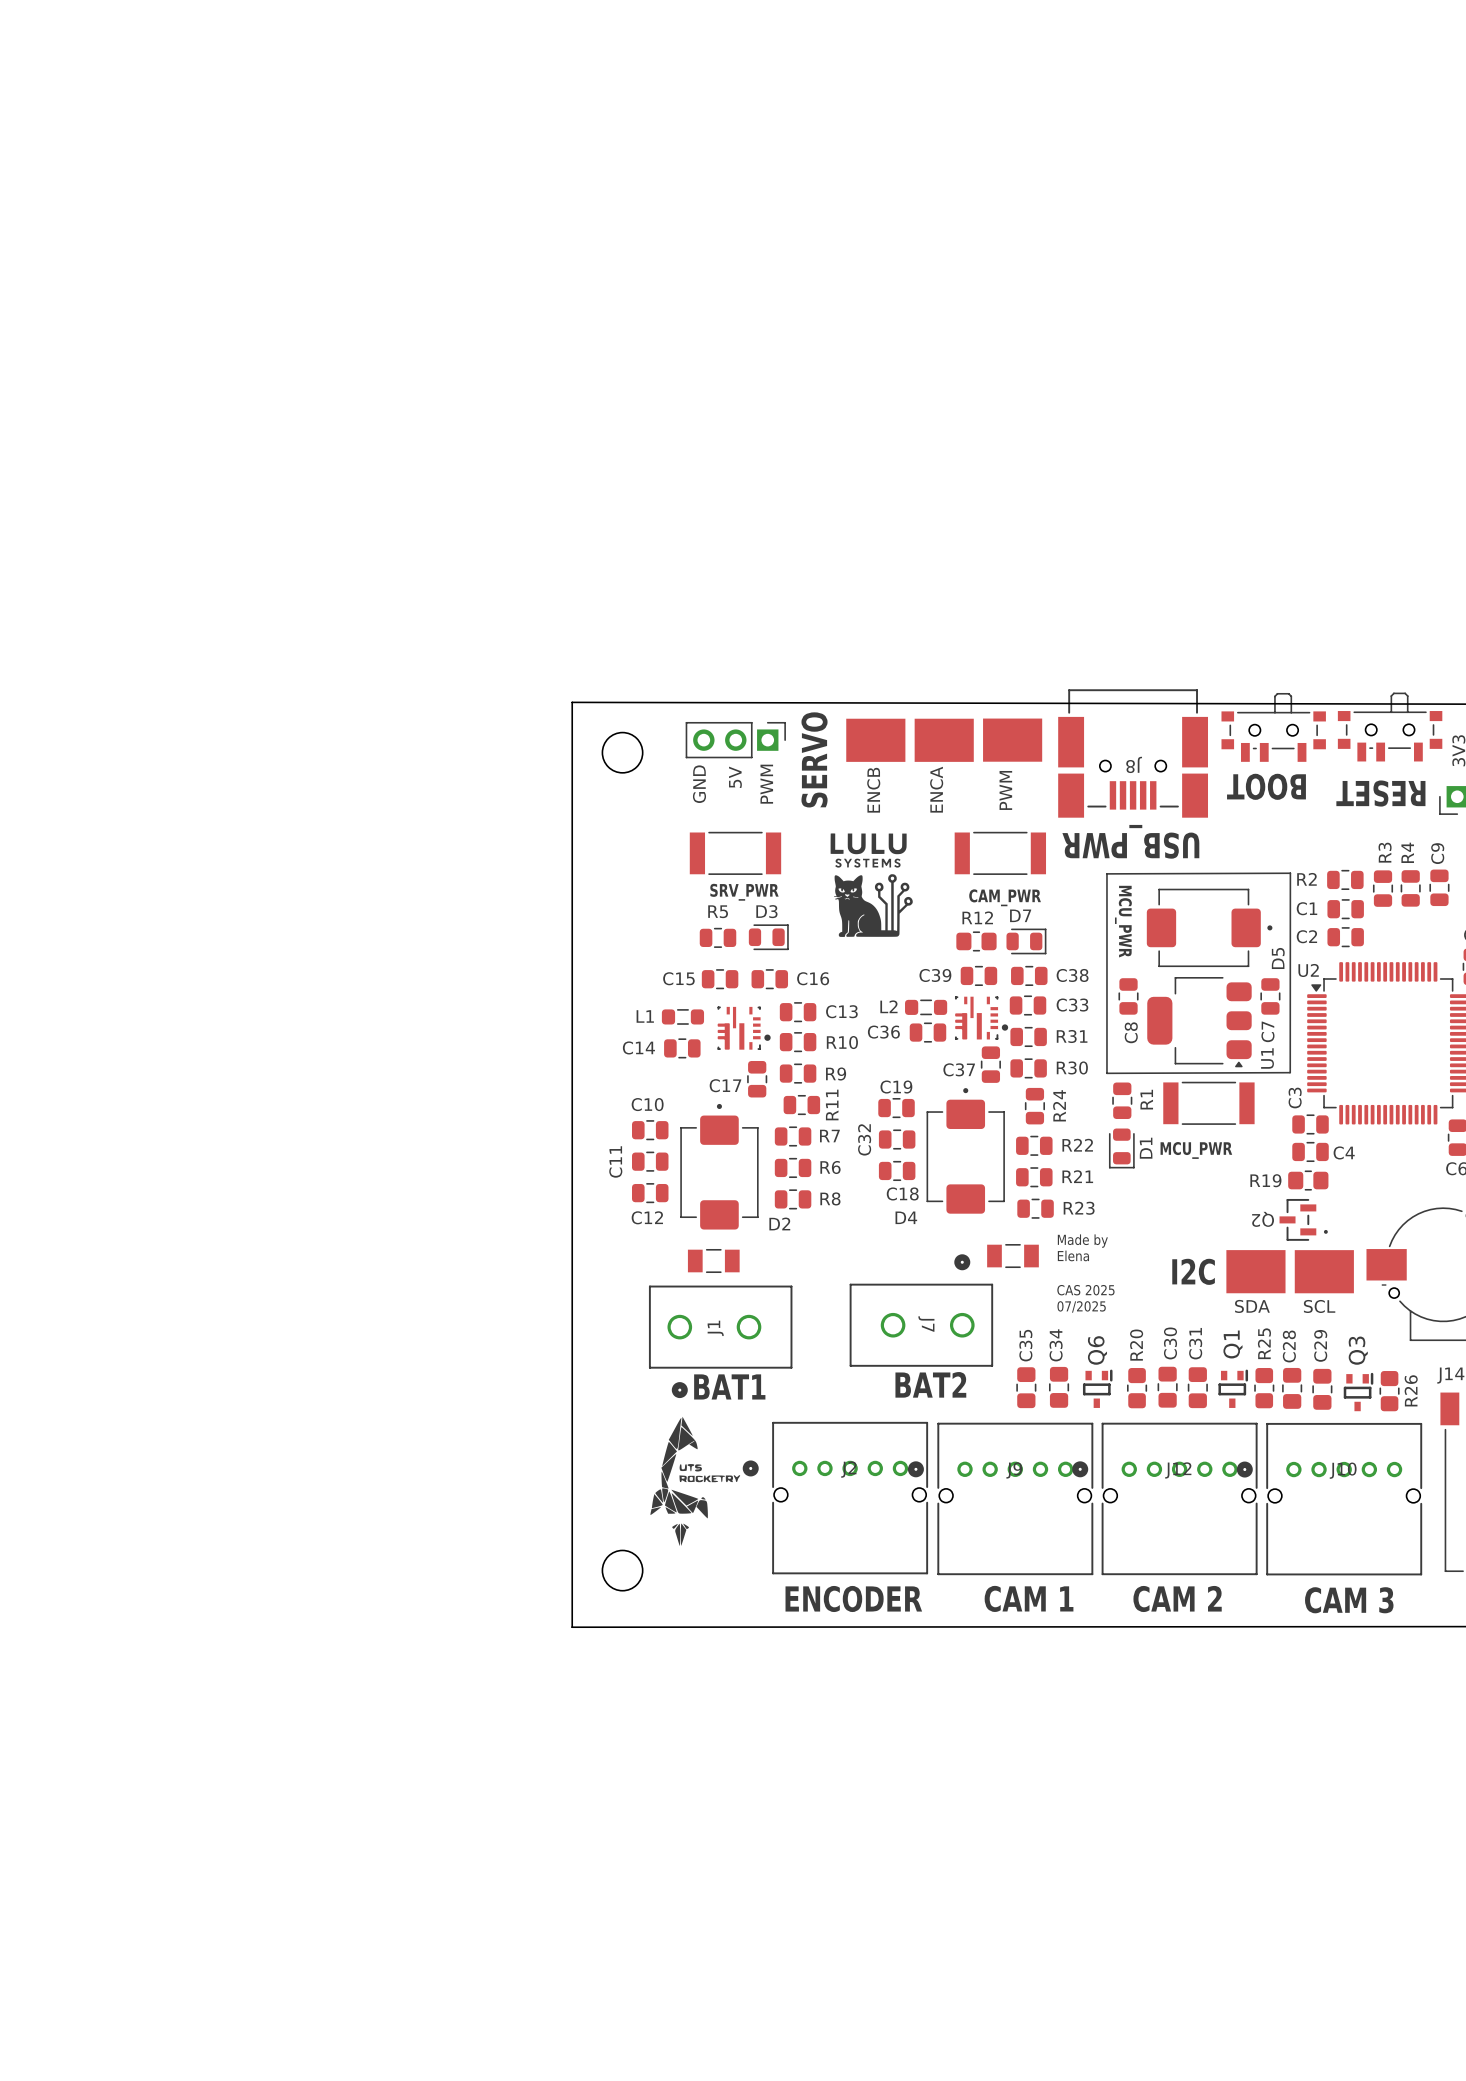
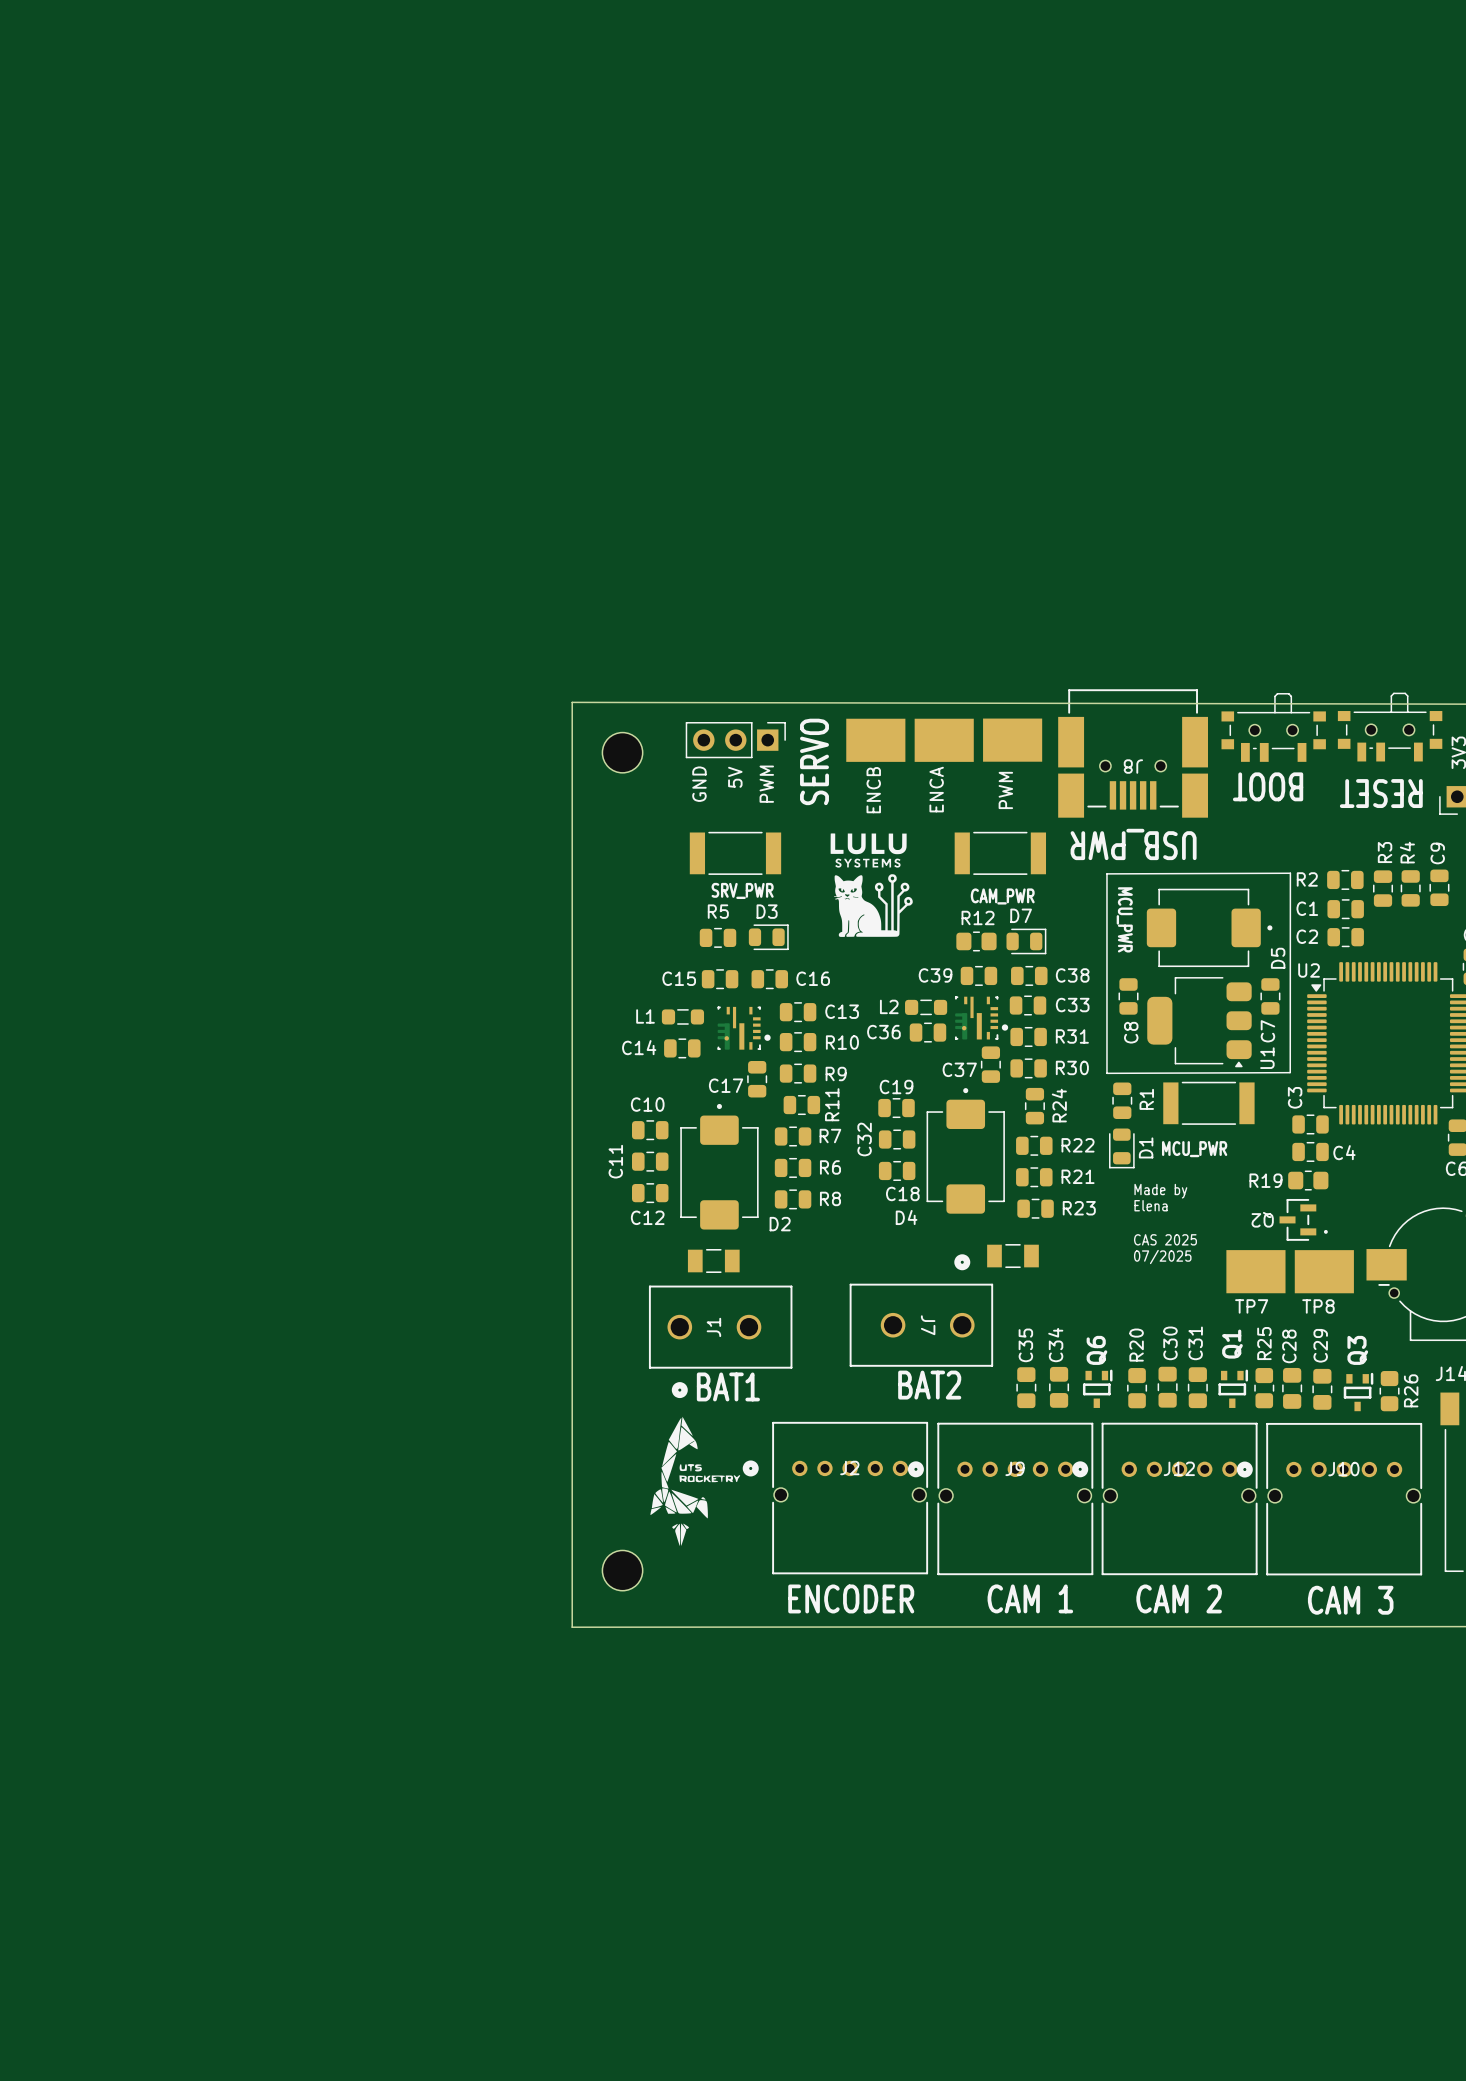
text position: Made by (1082, 1241) -> Made by (1160, 1191)
text position: Elena (1073, 1255) -> Elena (1151, 1205)
text: I2C (1193, 1271) -> none
text position: CAS 2025 (1085, 1290) -> CAS 2025 (1165, 1239)
text position: 07/2025 (1081, 1306) -> 07/2025 (1162, 1257)
SDA name: SDA (1252, 1306) -> TP7 (1251, 1306)
SCL name: SCL (1319, 1306) -> TP8 (1318, 1306)

